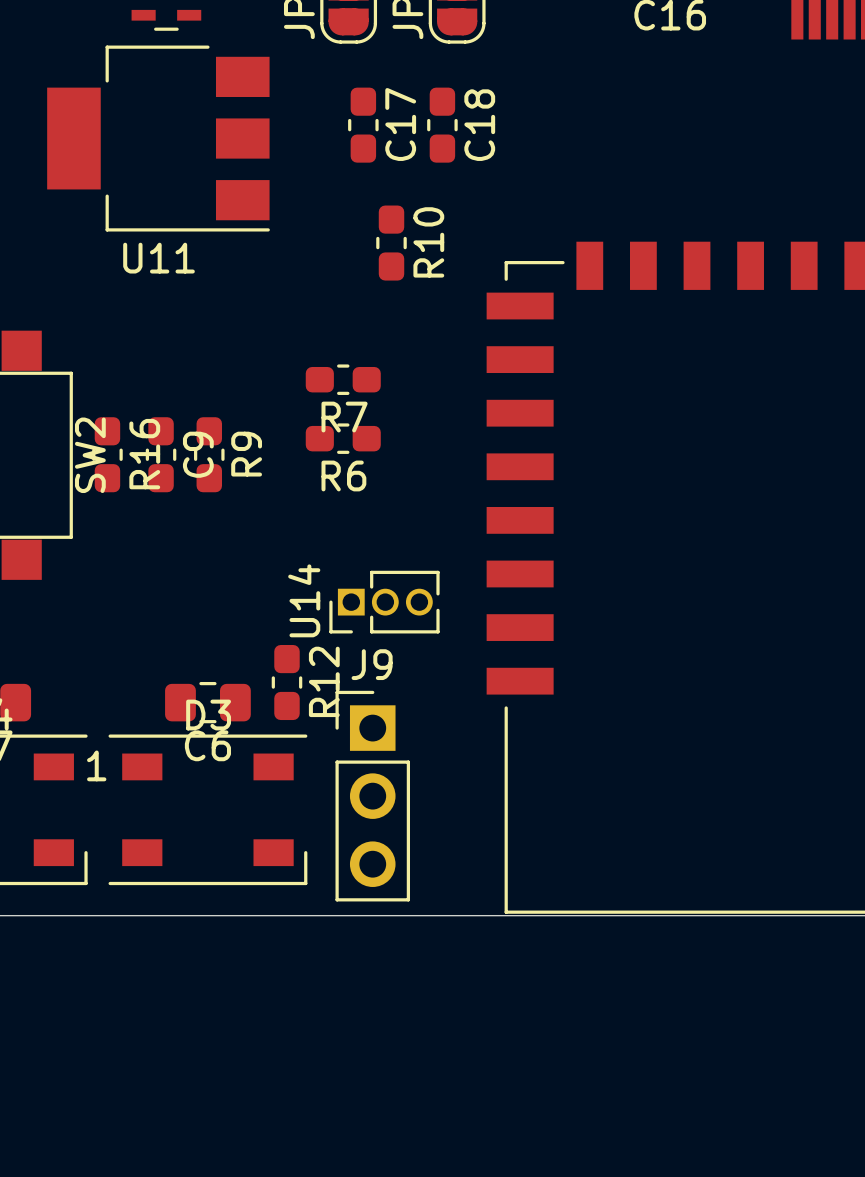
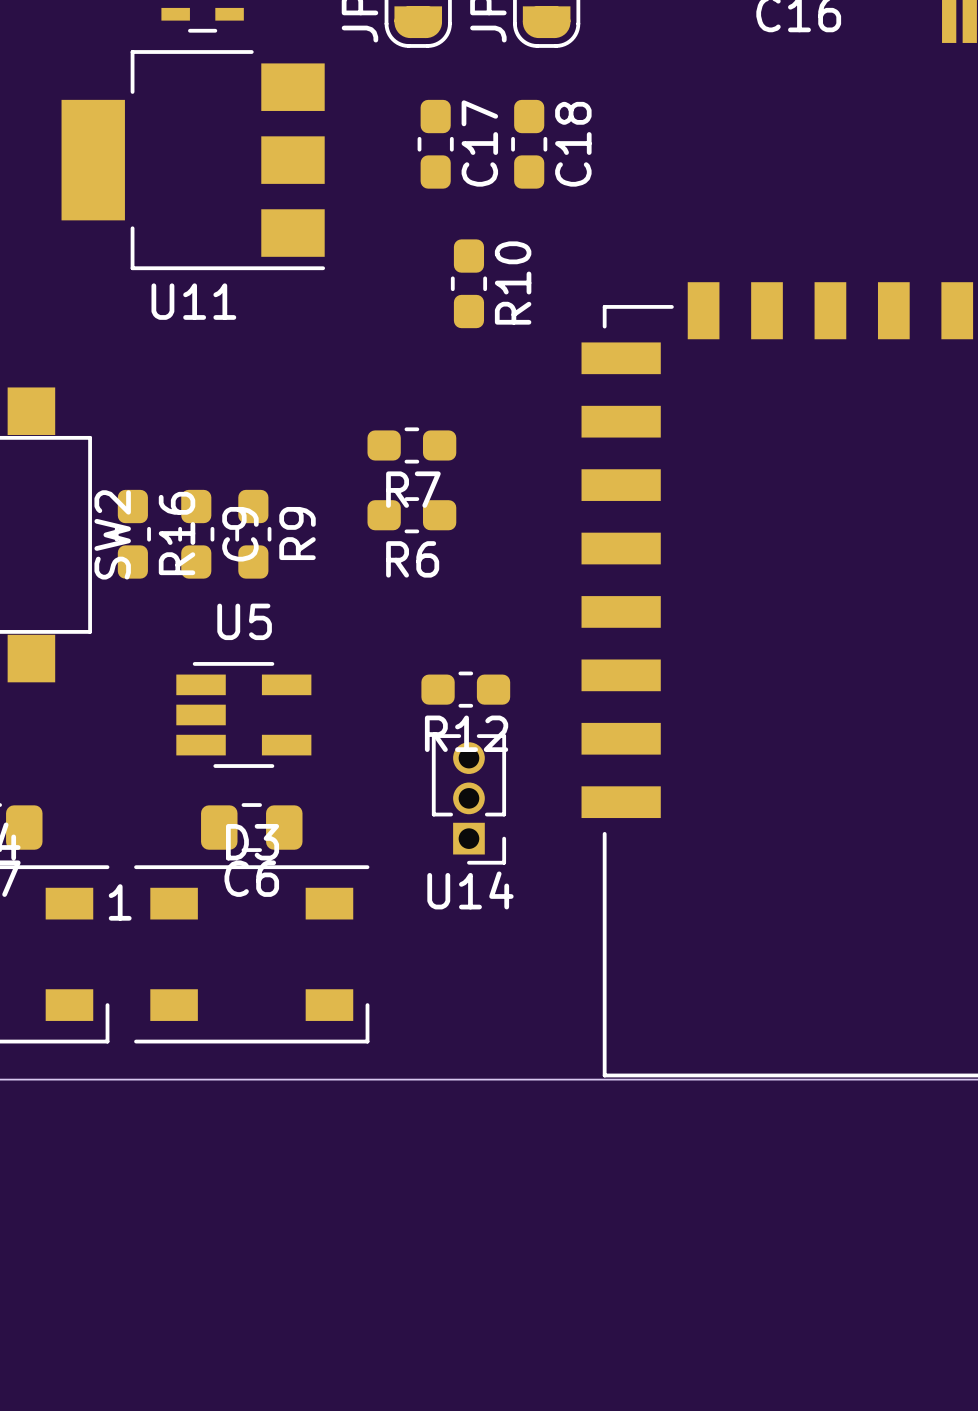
U14 rotation: 0° (384, 602) -> 90° counterclockwise (468, 799)
U14 position: (384, 602) -> (468, 799)
U5: none -> (243, 714)
R12 rotation: 0° (286, 682) -> 90° clockwise (465, 689)
R12 position: (286, 682) -> (465, 689)
J9: (372, 796) -> none

